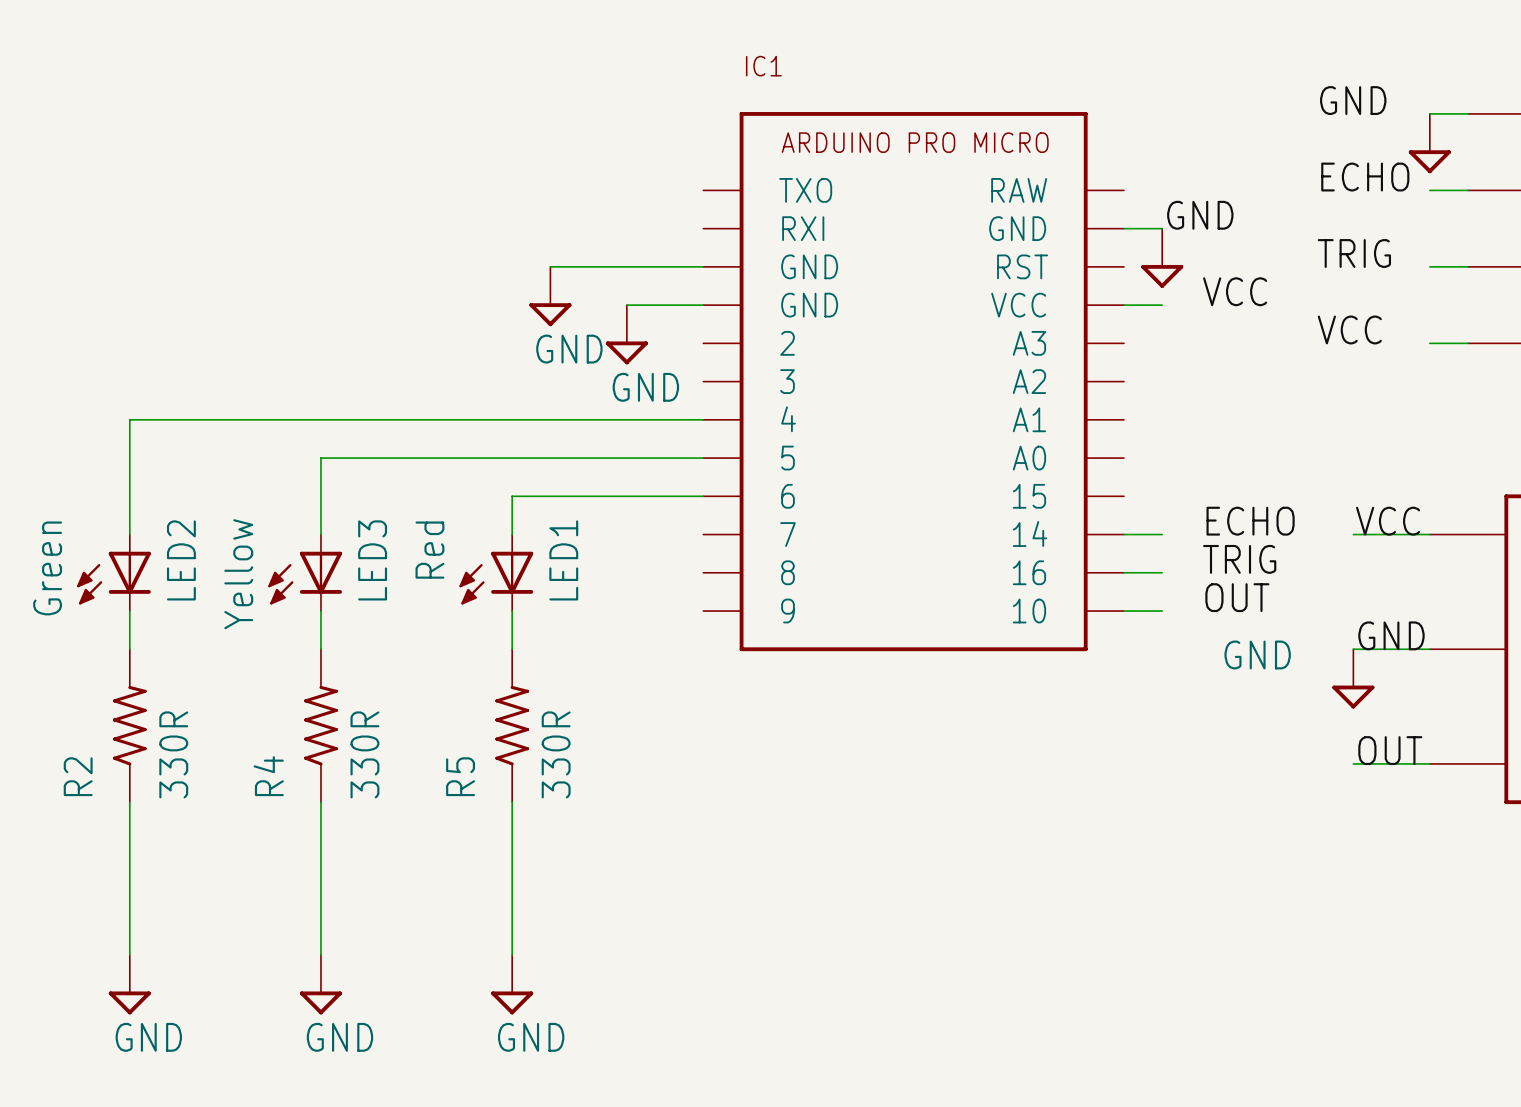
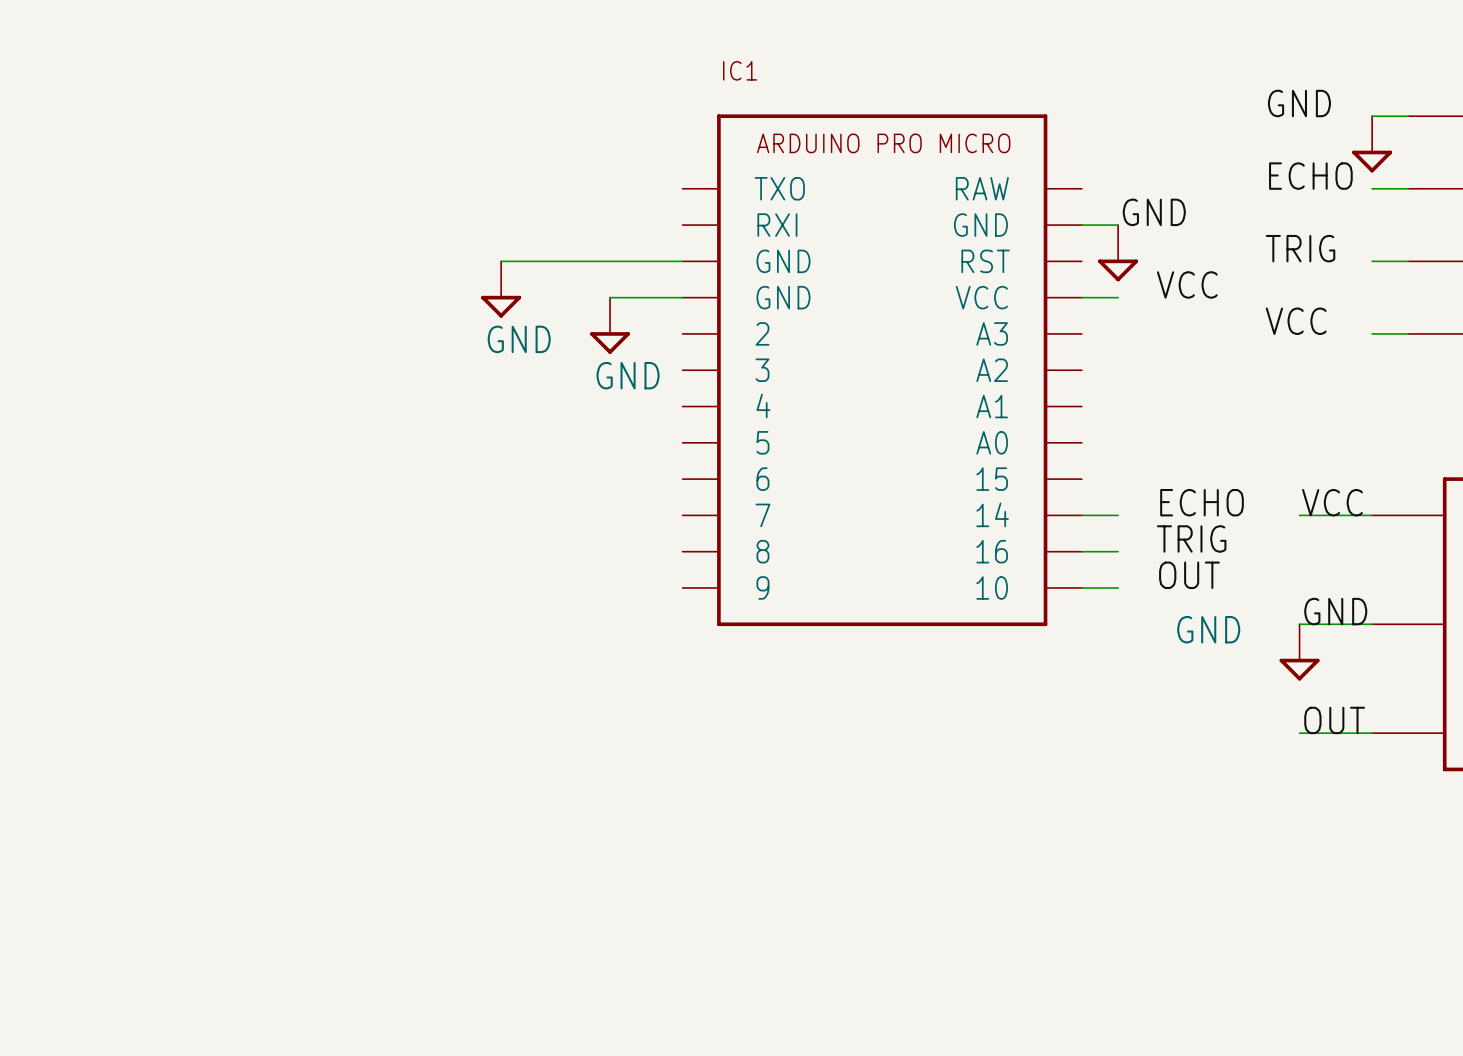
wire: none -> (501, 261) (537, 261)
power symbol position: GND (550, 296) -> GND (501, 289)
wire: (703, 419) (129, 419) (129, 534) -> none
wire: (703, 458) (320, 458) (320, 534) -> none
wire: (703, 496) (512, 496) (512, 534) -> none
LED2: Green (113, 572) -> none
LED3: Yellow (305, 572) -> none
LED1: Red (496, 572) -> none
wire: (129, 611) (129, 649) -> none
wire: (320, 611) (320, 649) -> none
wire: (512, 611) (512, 649) -> none
R2: 330R (129, 725) -> none
R4: 330R (320, 725) -> none
R5: 330R (512, 725) -> none
wire: (129, 802) (129, 955) -> none
wire: (320, 802) (320, 955) -> none
wire: (512, 802) (512, 955) -> none
power symbol: GND (129, 984) -> none
power symbol: GND (320, 984) -> none
power symbol: GND (512, 984) -> none

